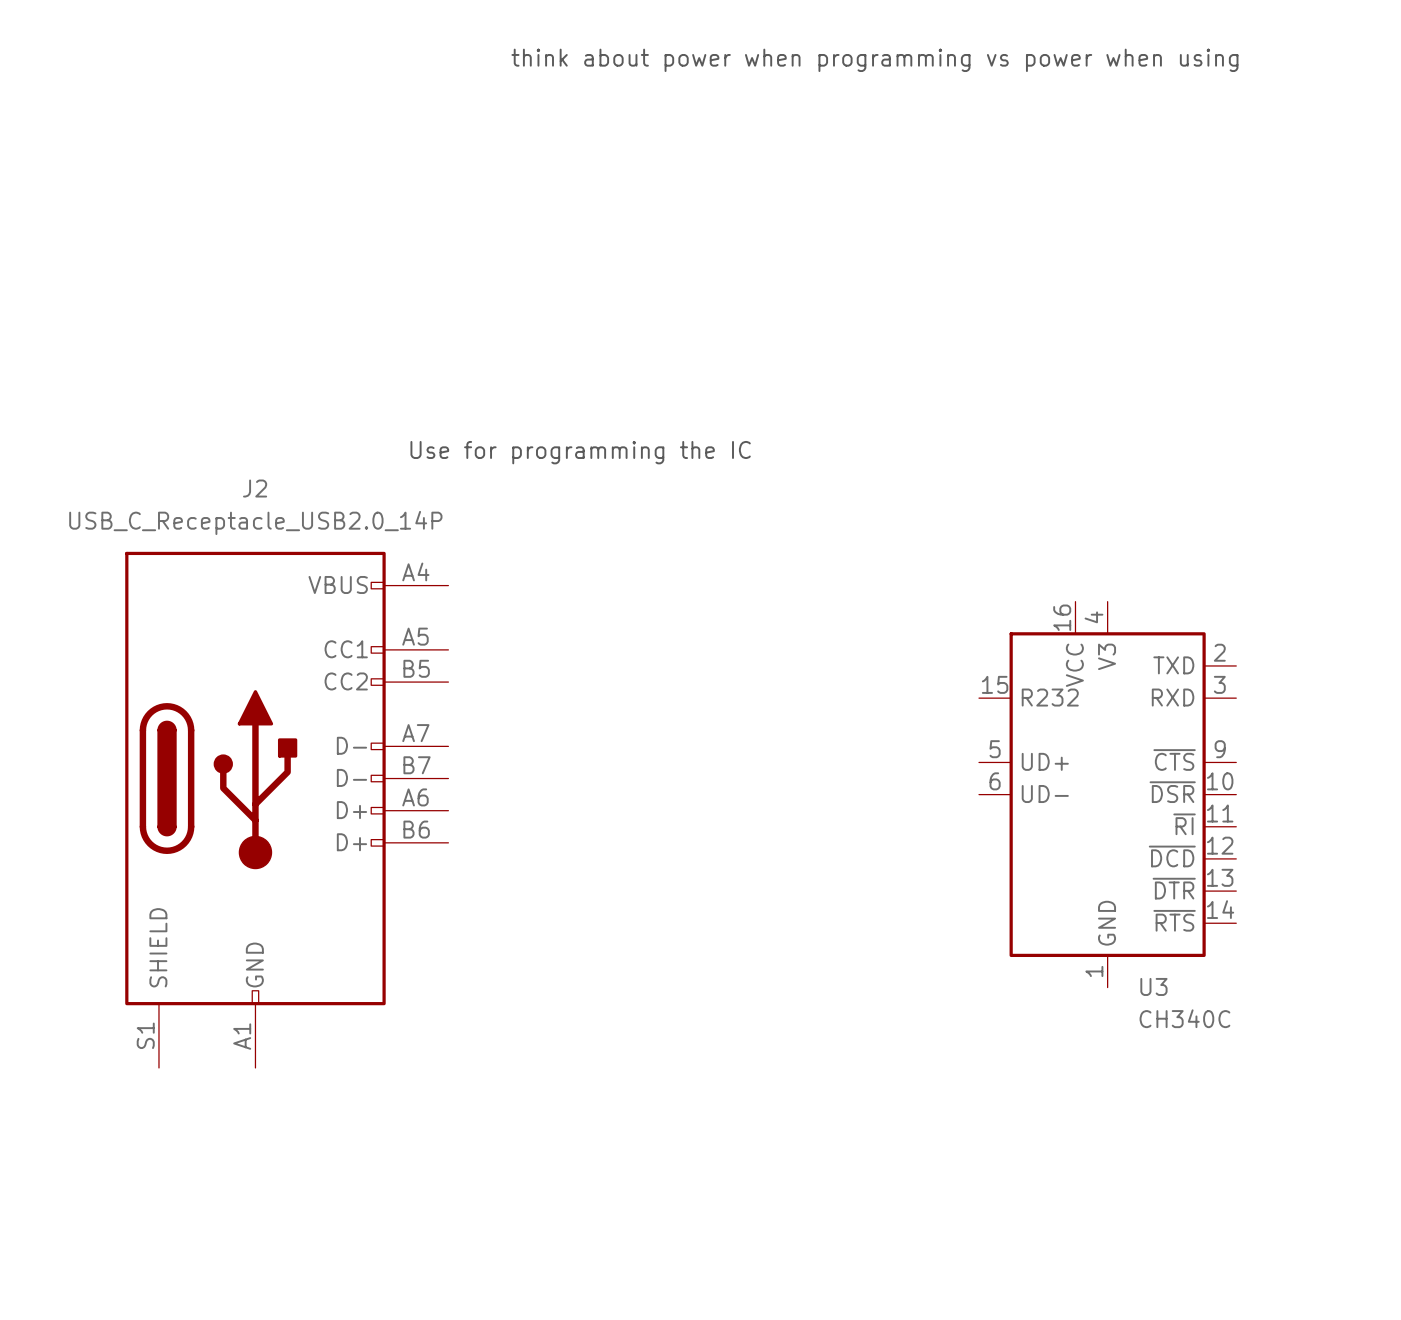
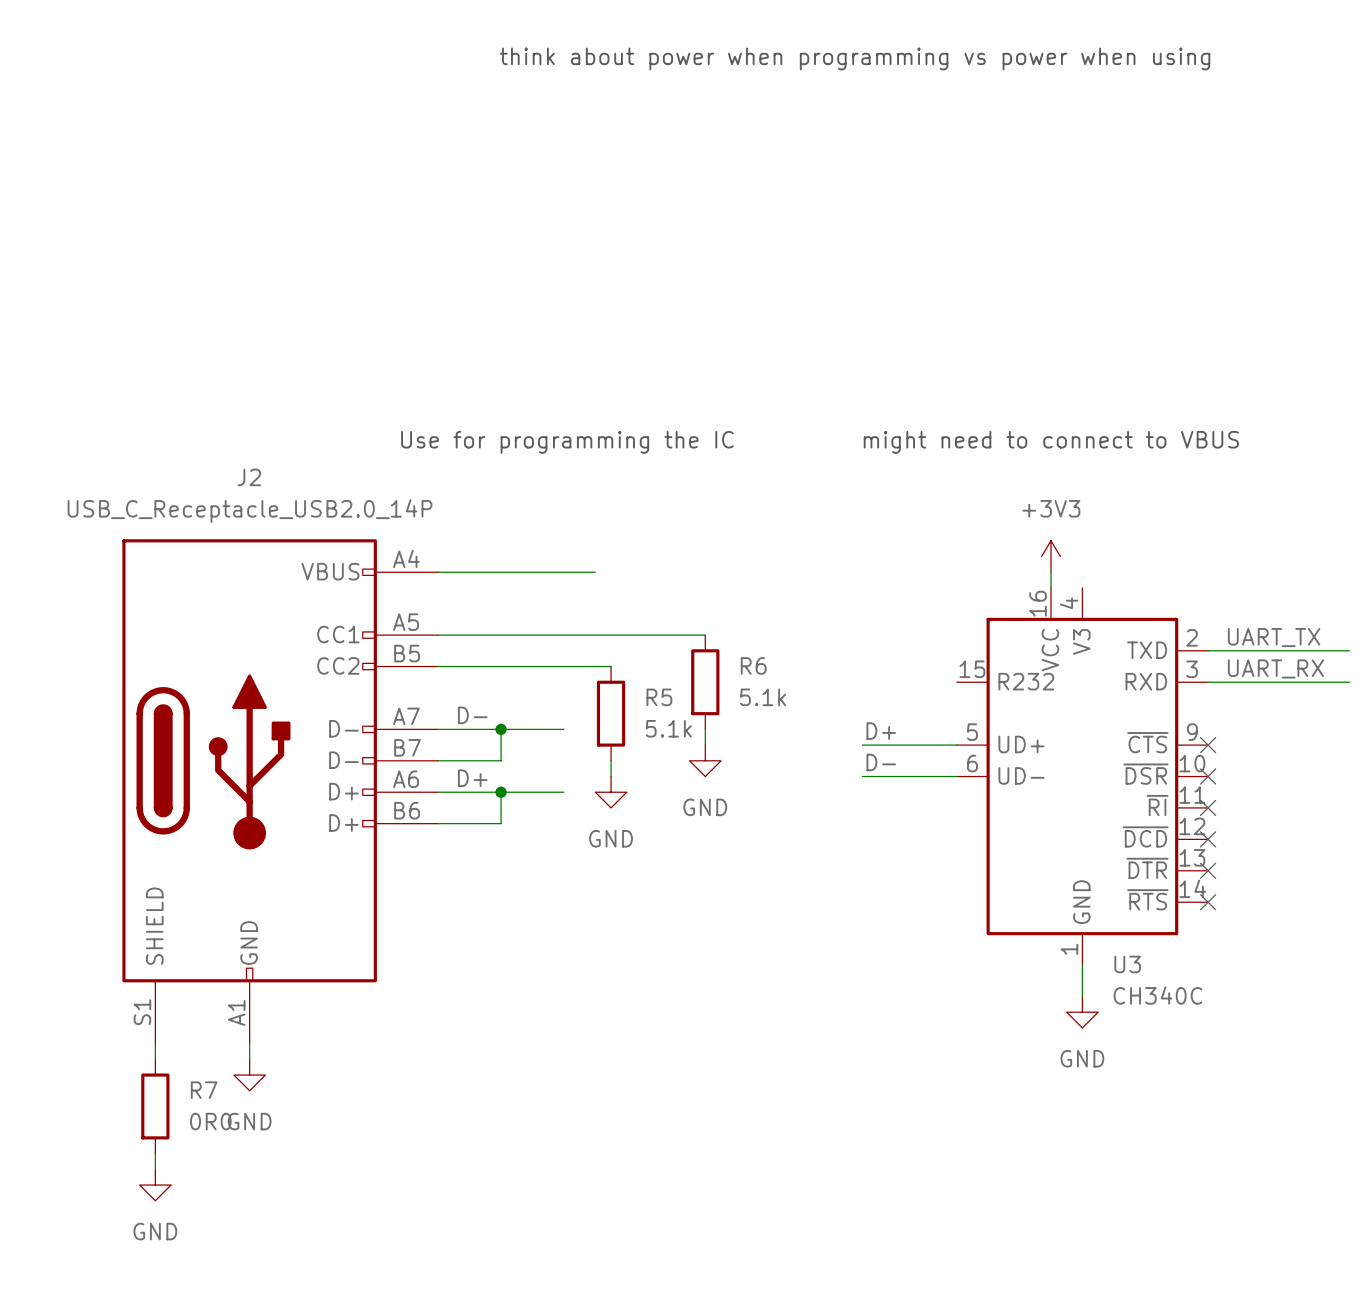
text: none -> might need to connect to VBUS (1051, 442)
power symbol: none -> +3V3 (1050, 556)
wire: none -> (438, 572) (595, 572)
wire: none -> (1050, 572) (1050, 587)
wire: none -> (438, 635) (705, 635)
label: none -> UART_TX (1274, 637)
wire: none -> (1208, 650) (1349, 650)
wire: none -> (438, 666) (611, 666)
label: none -> UART_RX (1275, 668)
R6: none -> 5.1k (705, 682)
wire: none -> (1208, 682) (1349, 682)
R5: none -> 5.1k (611, 713)
label: none -> D- (472, 715)
wire: none -> (438, 729) (563, 729)
wire: none -> (501, 729) (501, 760) (438, 760)
junction: none -> (501, 729)
wire: none -> (705, 729) (705, 745)
label: none -> D+ (881, 731)
wire: none -> (862, 745) (956, 745)
no-connect mark: none -> (1208, 745)
wire: none -> (611, 760) (611, 776)
power symbol: none -> GND (705, 760)
label: none -> D- (881, 762)
wire: none -> (862, 776) (956, 776)
no-connect mark: none -> (1208, 776)
label: none -> D+ (472, 778)
wire: none -> (438, 792) (563, 792)
wire: none -> (501, 792) (501, 823) (438, 823)
junction: none -> (501, 792)
power symbol: none -> GND (611, 792)
no-connect mark: none -> (1208, 807)
no-connect mark: none -> (1208, 839)
no-connect mark: none -> (1208, 870)
no-connect mark: none -> (1208, 902)
wire: none -> (1082, 965) (1082, 996)
power symbol: none -> GND (1082, 1012)
wire: none -> (155, 1043) (155, 1059)
wire: none -> (249, 1043) (249, 1059)
power symbol: none -> GND (249, 1075)
R7: none -> 0R0 (155, 1106)
wire: none -> (155, 1153) (155, 1169)
power symbol: none -> GND (155, 1185)

